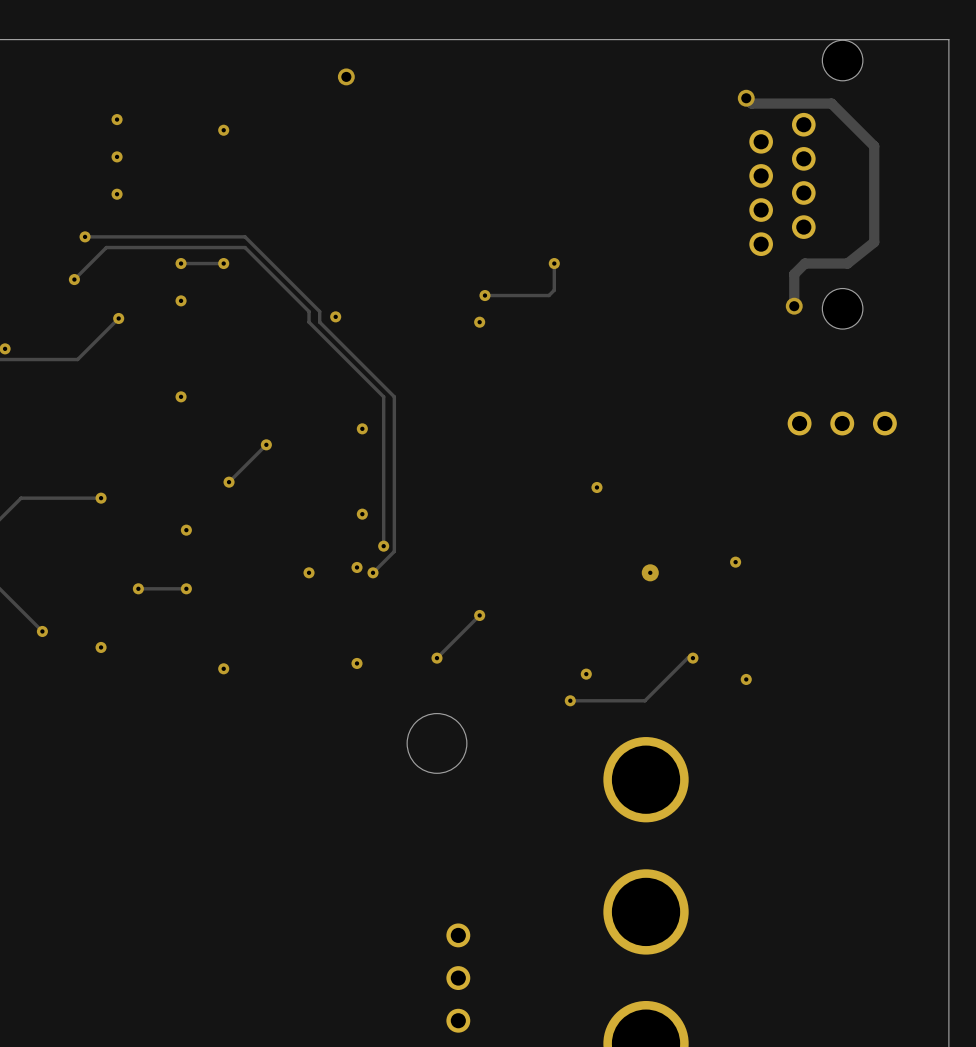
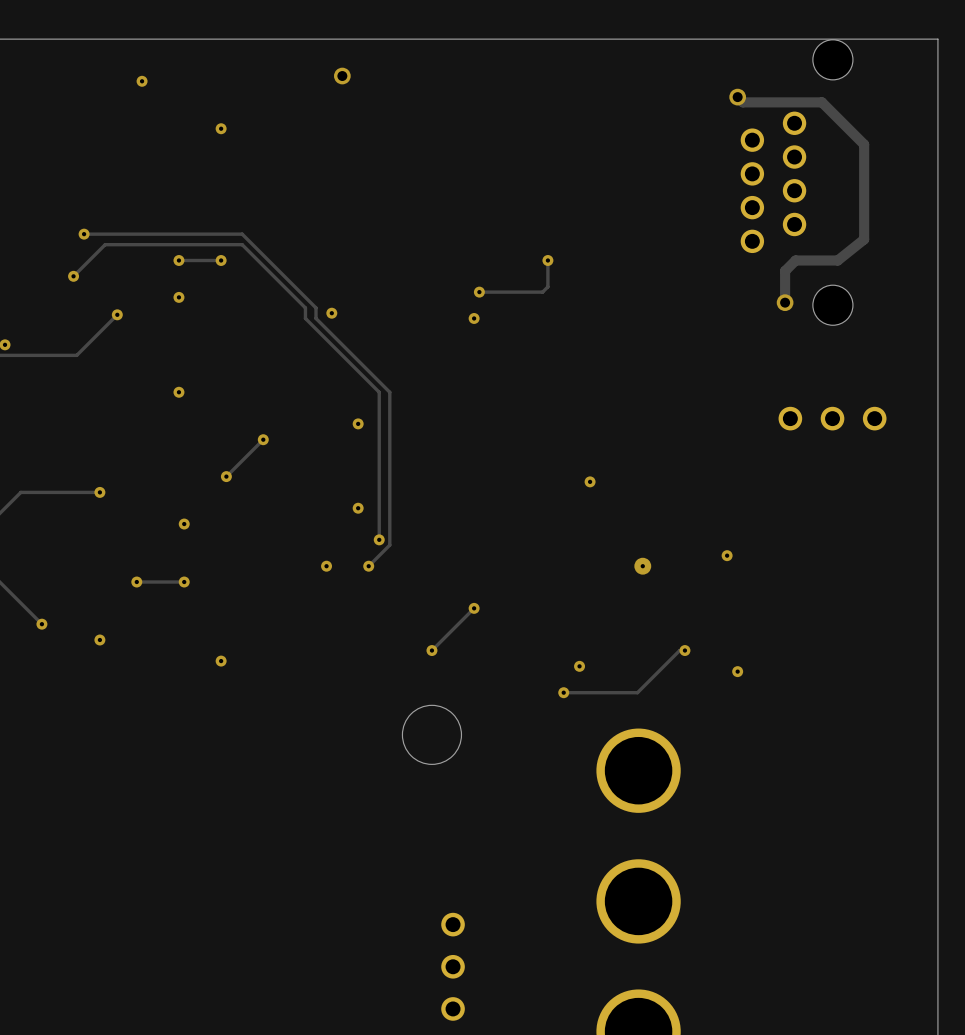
via: none -> (142, 81)
via: (117, 119) -> none
via: (117, 156) -> none
via: (117, 194) -> none
via: (357, 567) -> none
via: (309, 572) -> none
via: none -> (326, 566)
via: (357, 663) -> none

